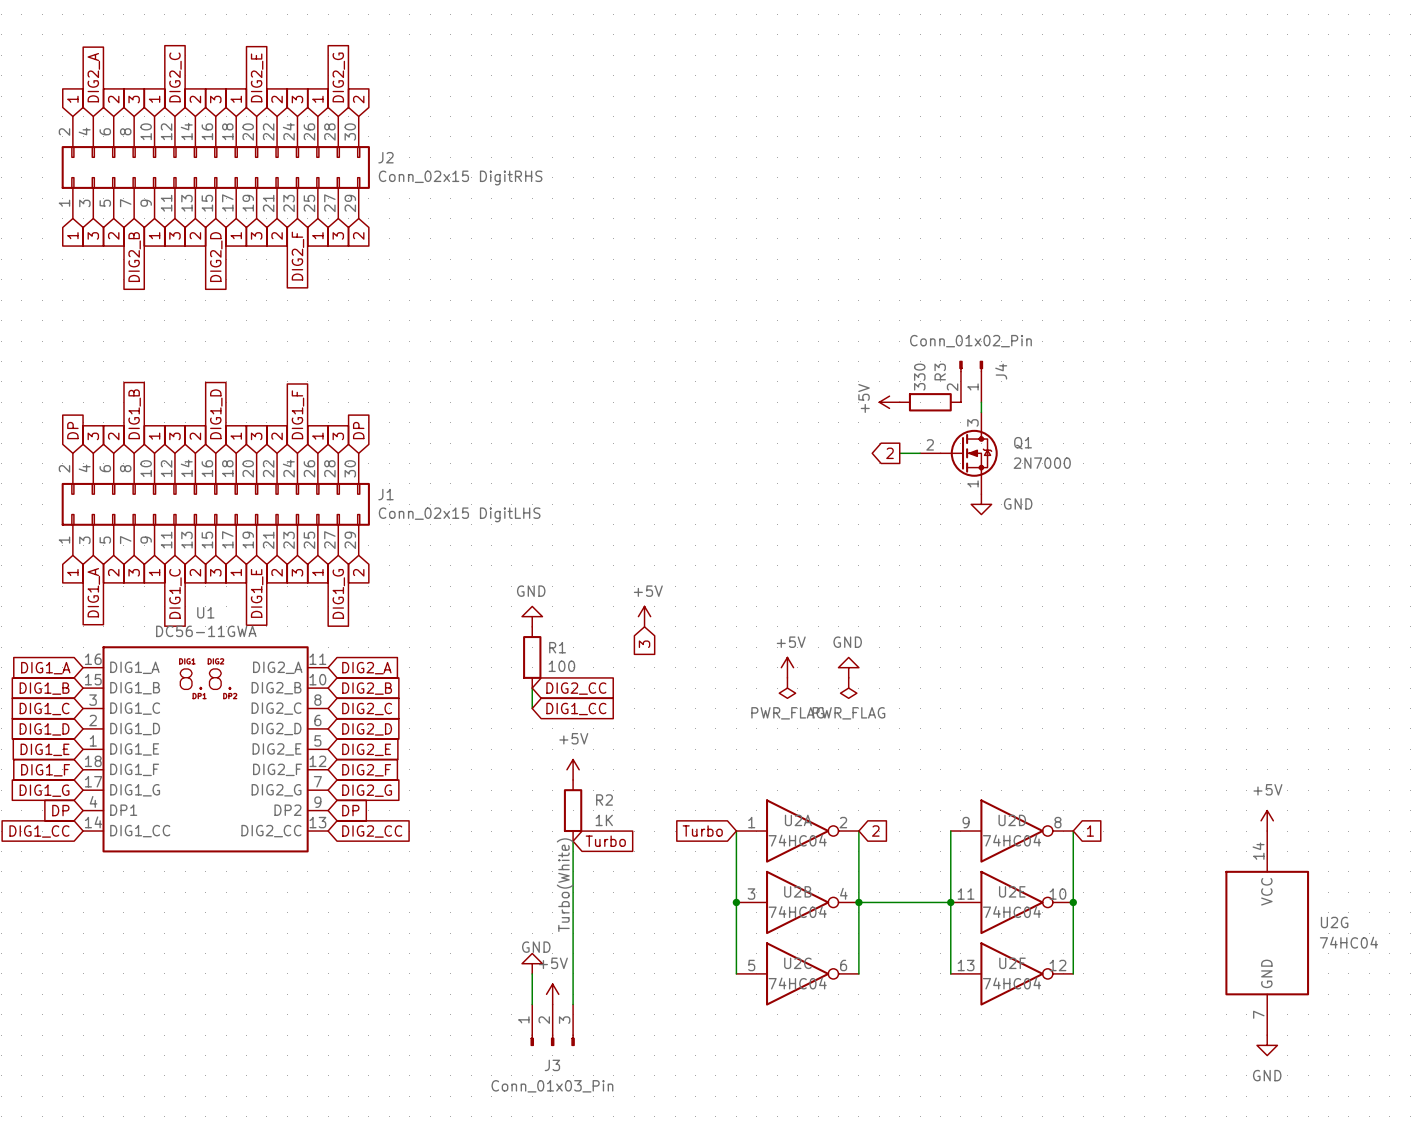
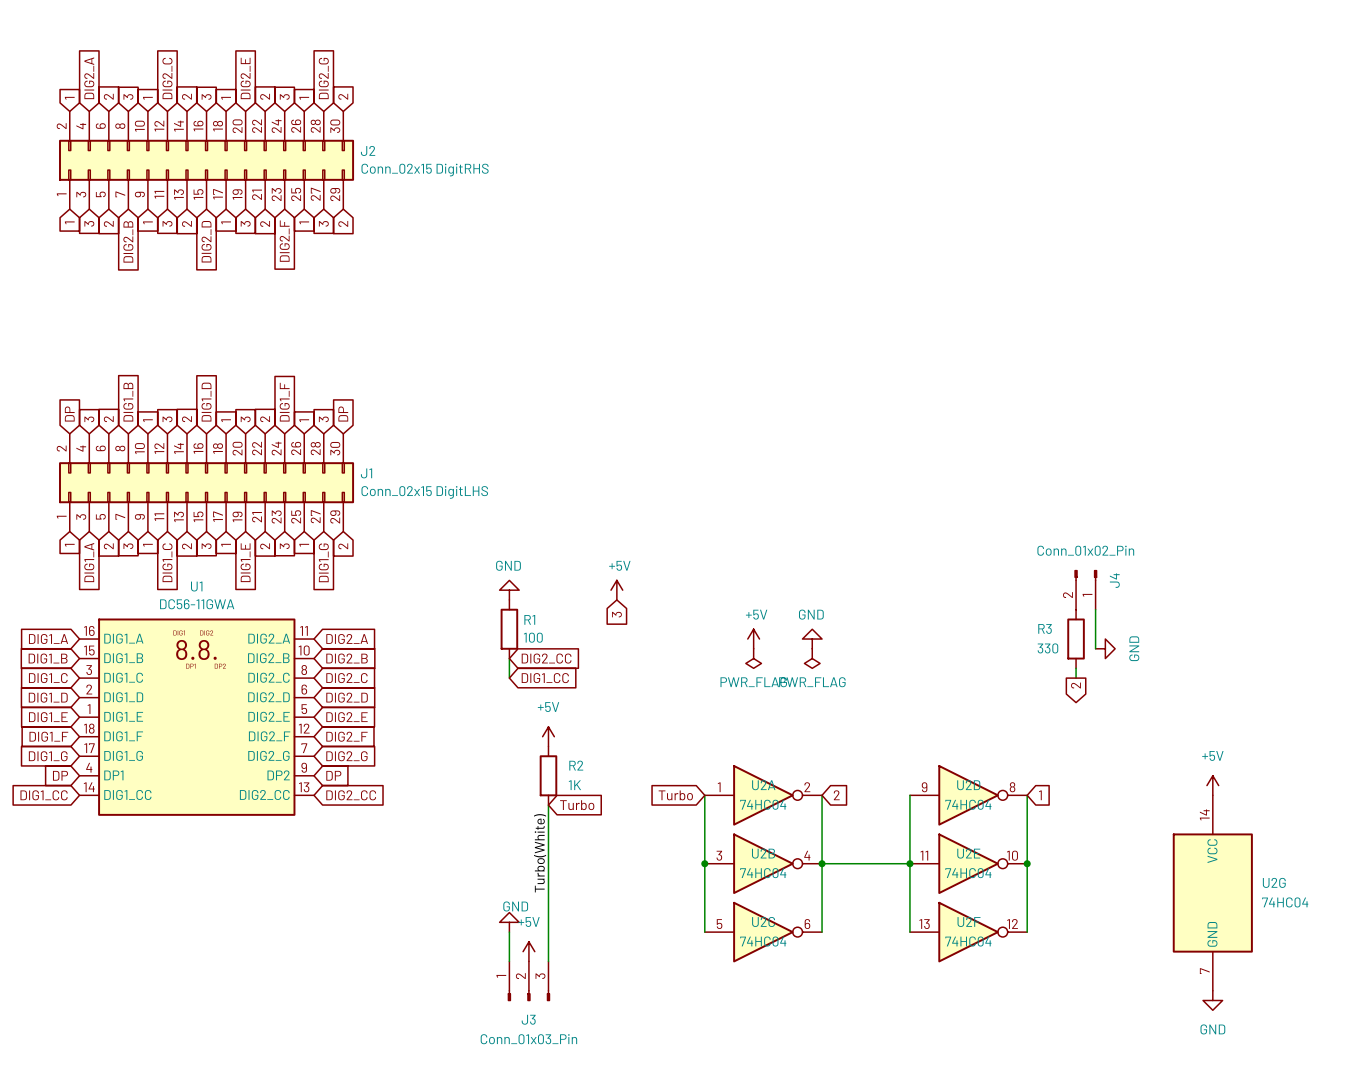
R3 name position: R3 (940, 371) -> R3 (1045, 628)
R3 value position: 330 (919, 377) -> 330 (1047, 648)
J4 position: (971, 381) -> (1085, 589)
power symbol: +5V (889, 402) -> none
R3 rotation: 0° (930, 402) -> 90° clockwise (1076, 639)
R3 position: (930, 402) -> (1076, 639)
wire: (981, 402) (981, 412) -> none
global label: 2 (889, 453) -> none
wire: (899, 453) (920, 453) -> none
Q1: 2N7000 (958, 453) -> none
power symbol: GND (981, 504) -> none
wire: none -> (1095, 609) (1095, 648)
power symbol: none -> GND (1105, 648)
wire: none -> (1076, 668) (1076, 678)
global label: none -> 2 (1075, 685)

